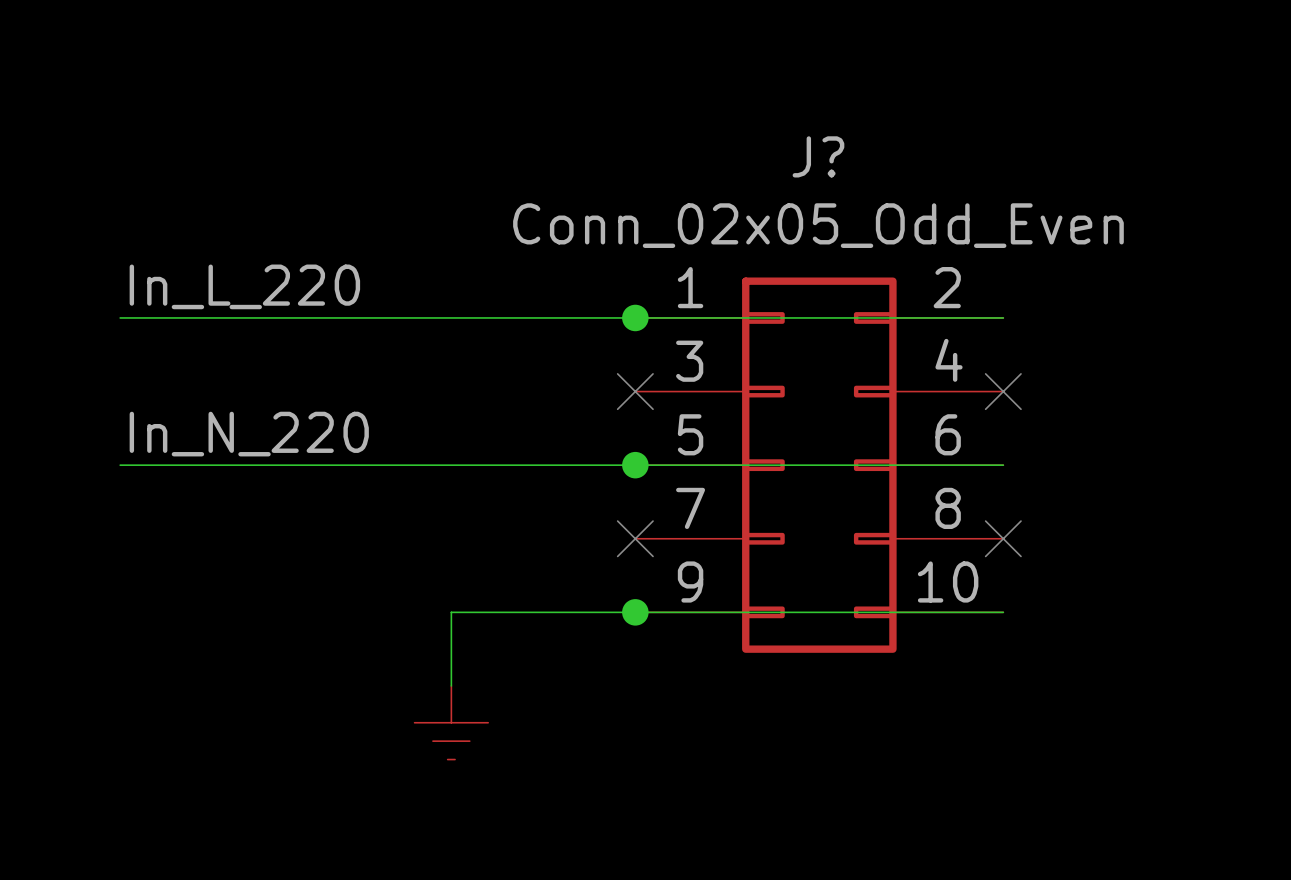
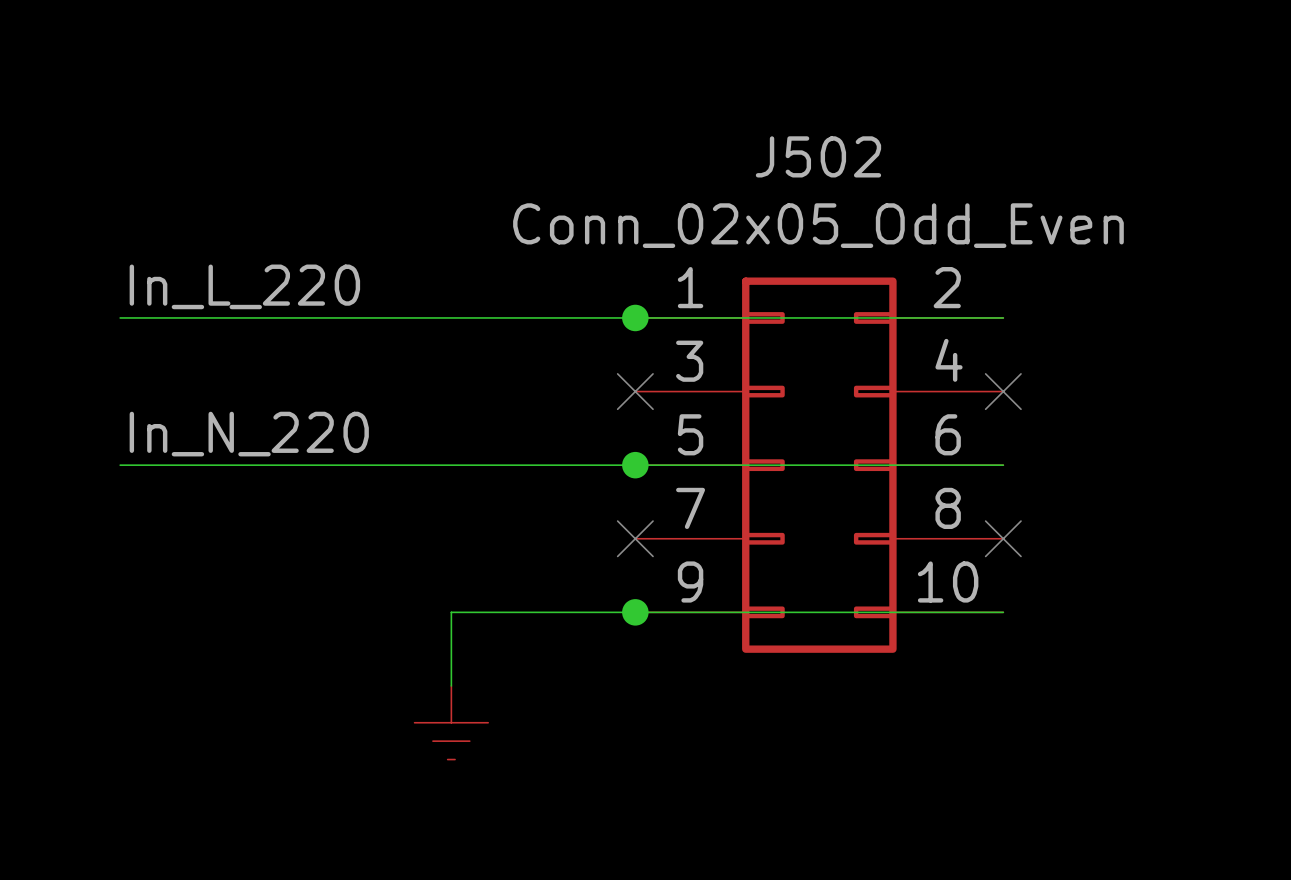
J? name: J? (818, 156) -> J502 (818, 156)

